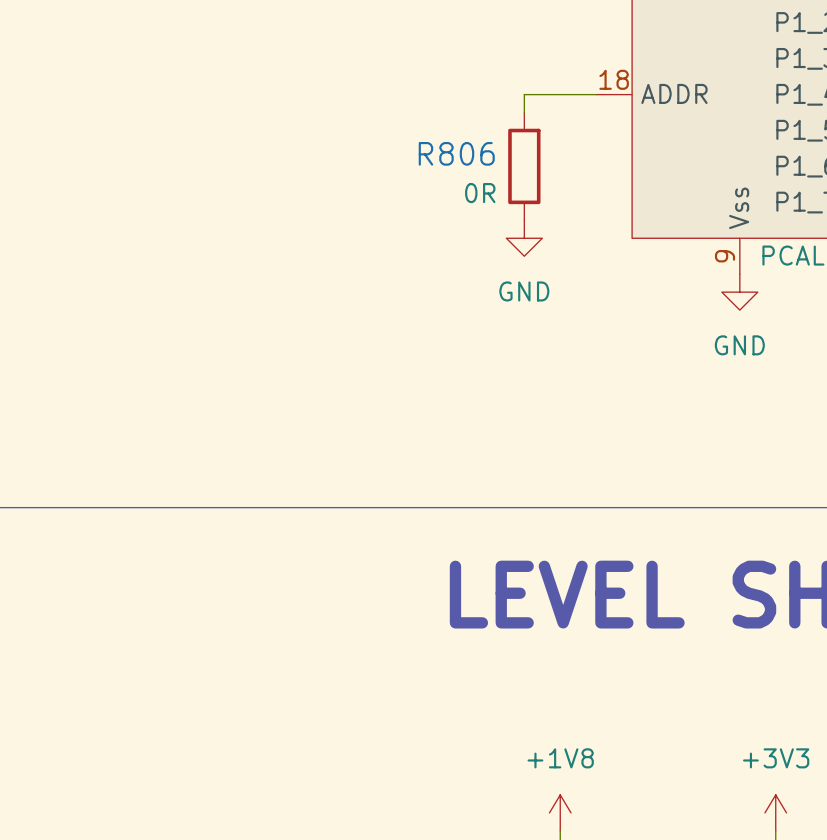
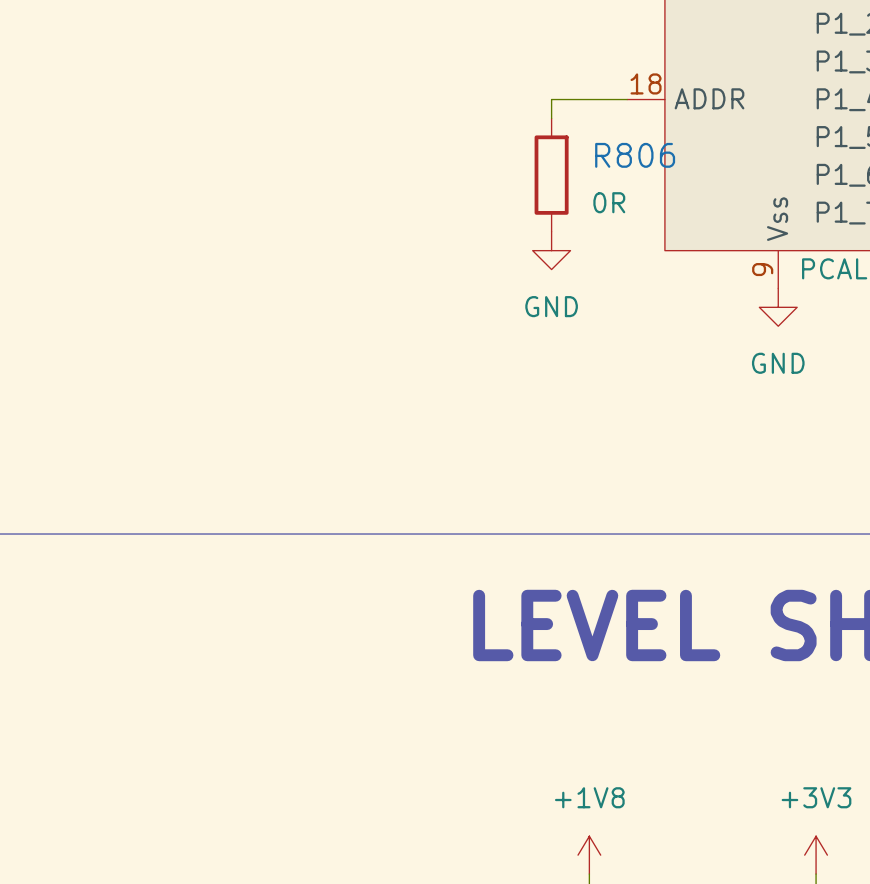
R806 name position: R806 (456, 153) -> R806 (635, 155)
R806 text position: 0R (480, 193) -> 0R (609, 202)

